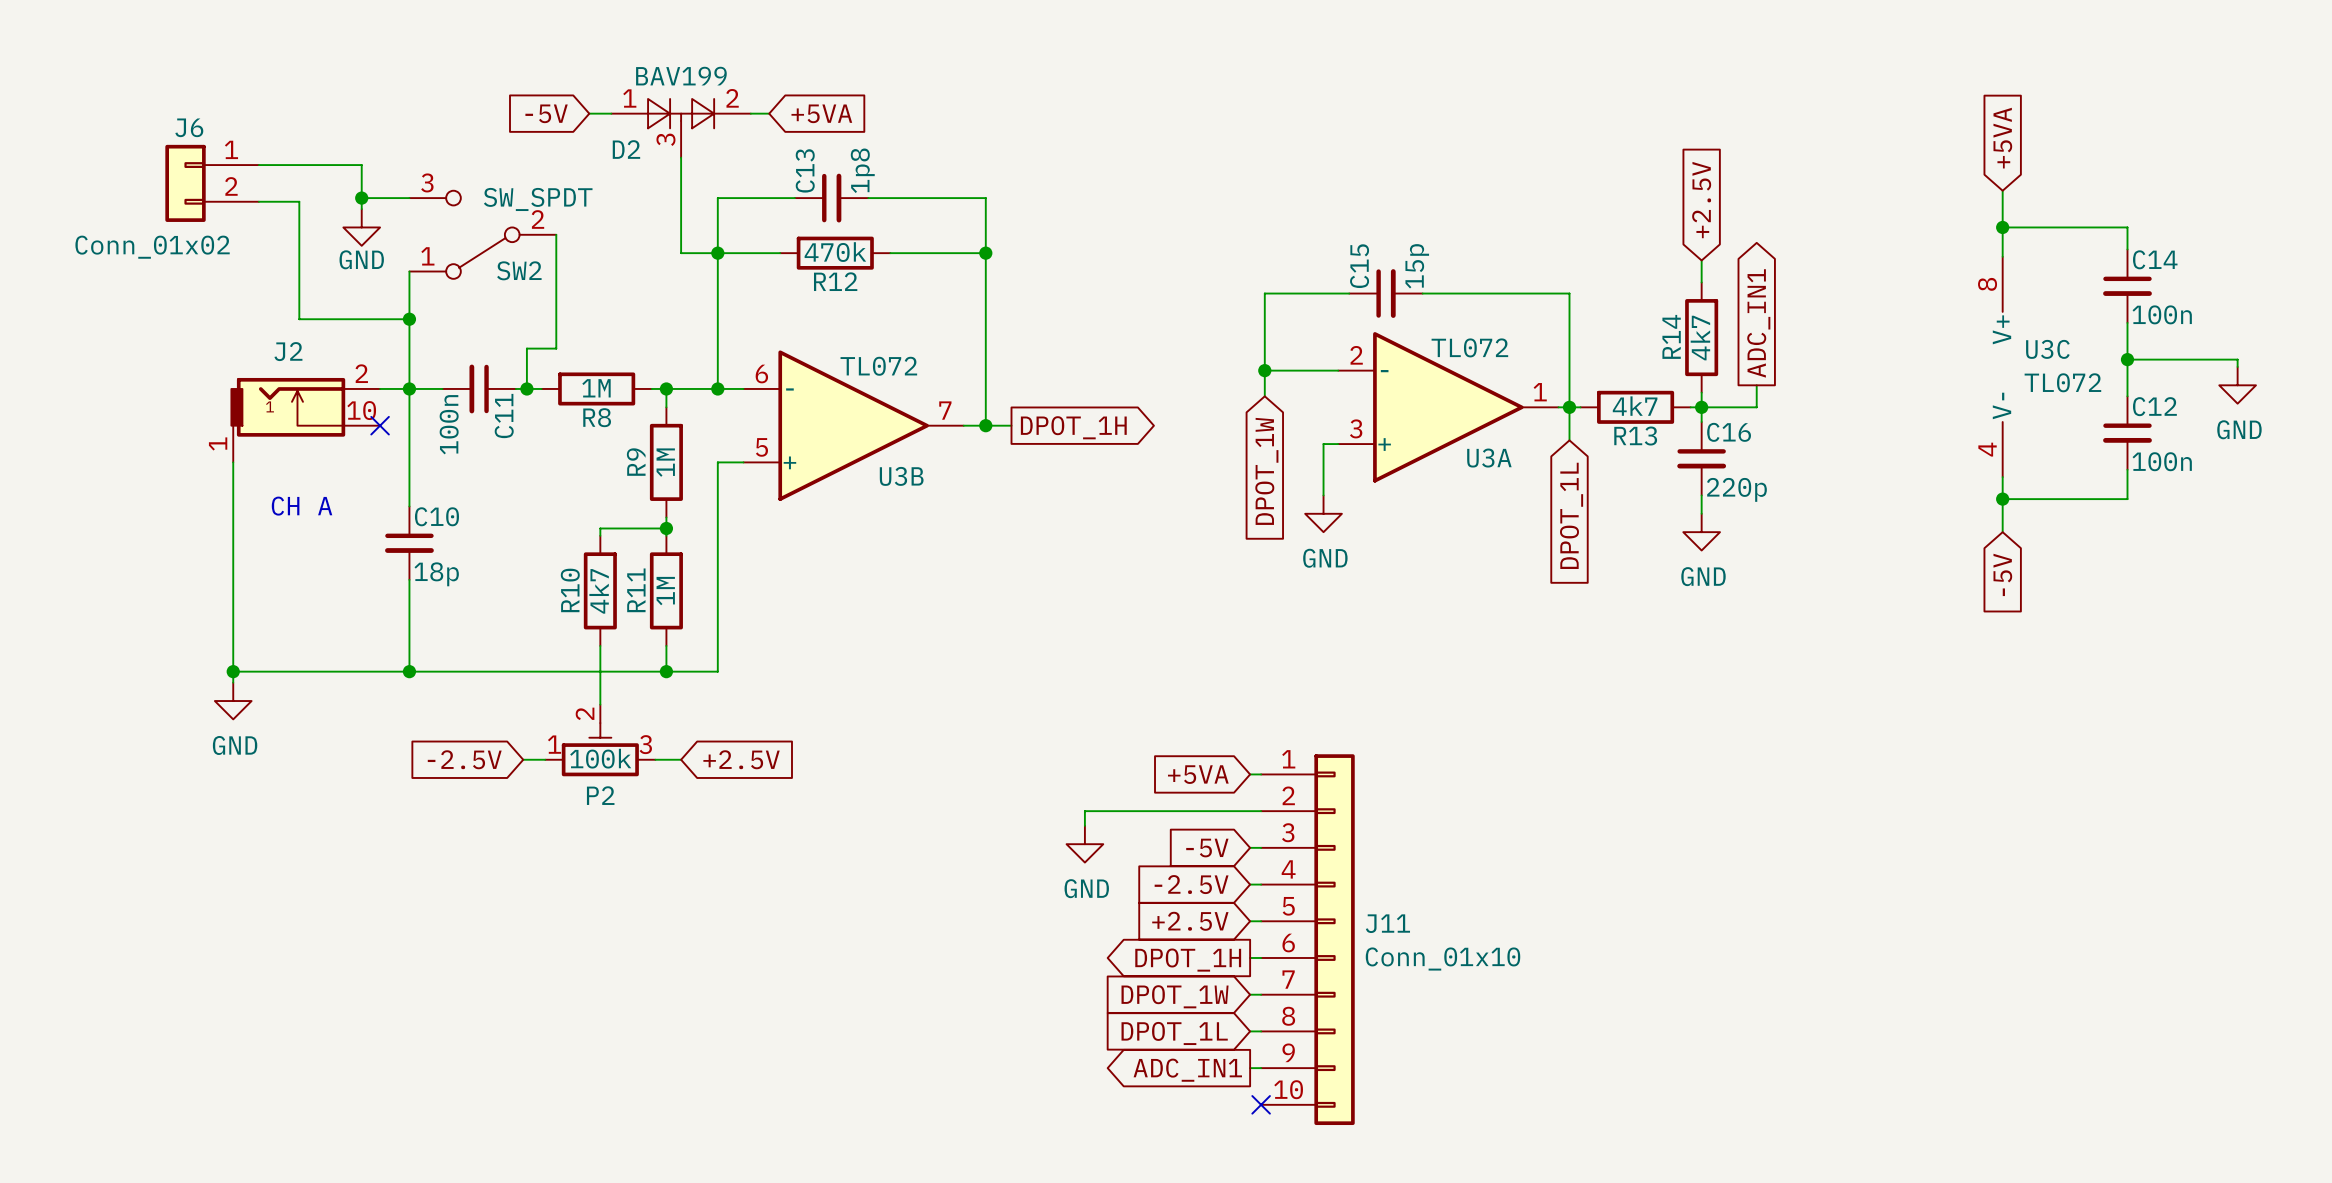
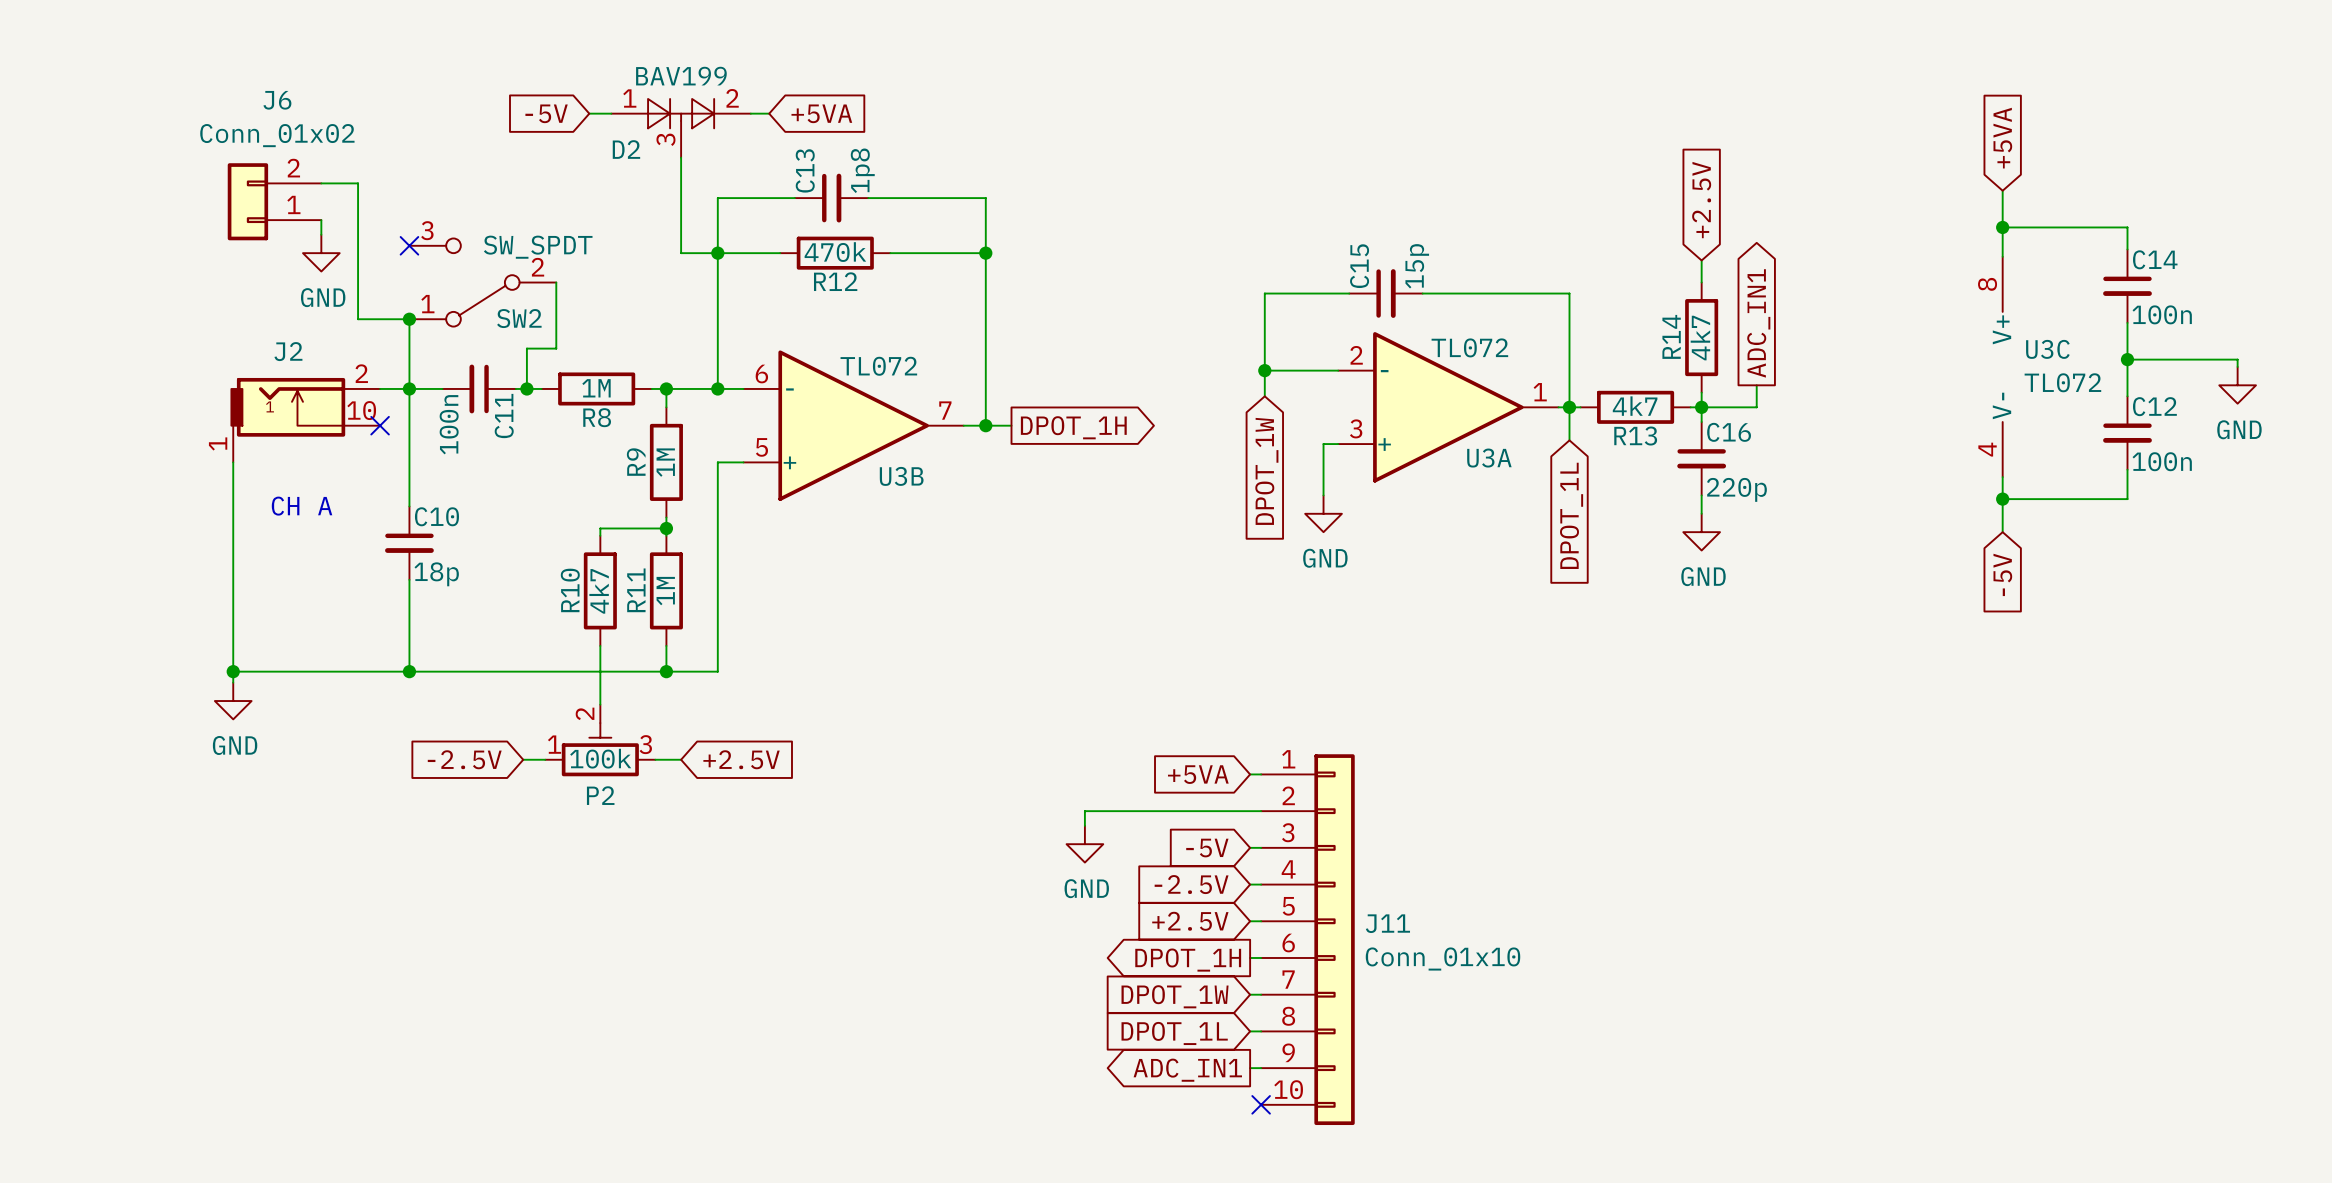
J6 name position: J6 (189, 127) -> J6 (277, 100)
wire: (258, 165) (361, 165) (361, 209) -> none
J6 flip: as is (185, 183) -> up-down (247, 201)
J6 position: (212, 183) -> (274, 201)
wire: (361, 198) (409, 198) -> none
junction: (361, 198) -> none
wire: (258, 201) (299, 201) (299, 319) (358, 319) -> (321, 183) (358, 183) (358, 319)
wire: none -> (321, 220) (321, 234)
power symbol position: GND (361, 227) -> GND (321, 253)
SW2 position: (482, 234) -> (482, 282)
wire: (556, 234) (556, 282) -> none
no-connect mark: none -> (409, 245)
J6 value position: Conn_01x02 (152, 247) -> Conn_01x02 (277, 135)
power symbol text position: GND (361, 259) -> GND (323, 297)
wire: (409, 271) (409, 319) -> none

